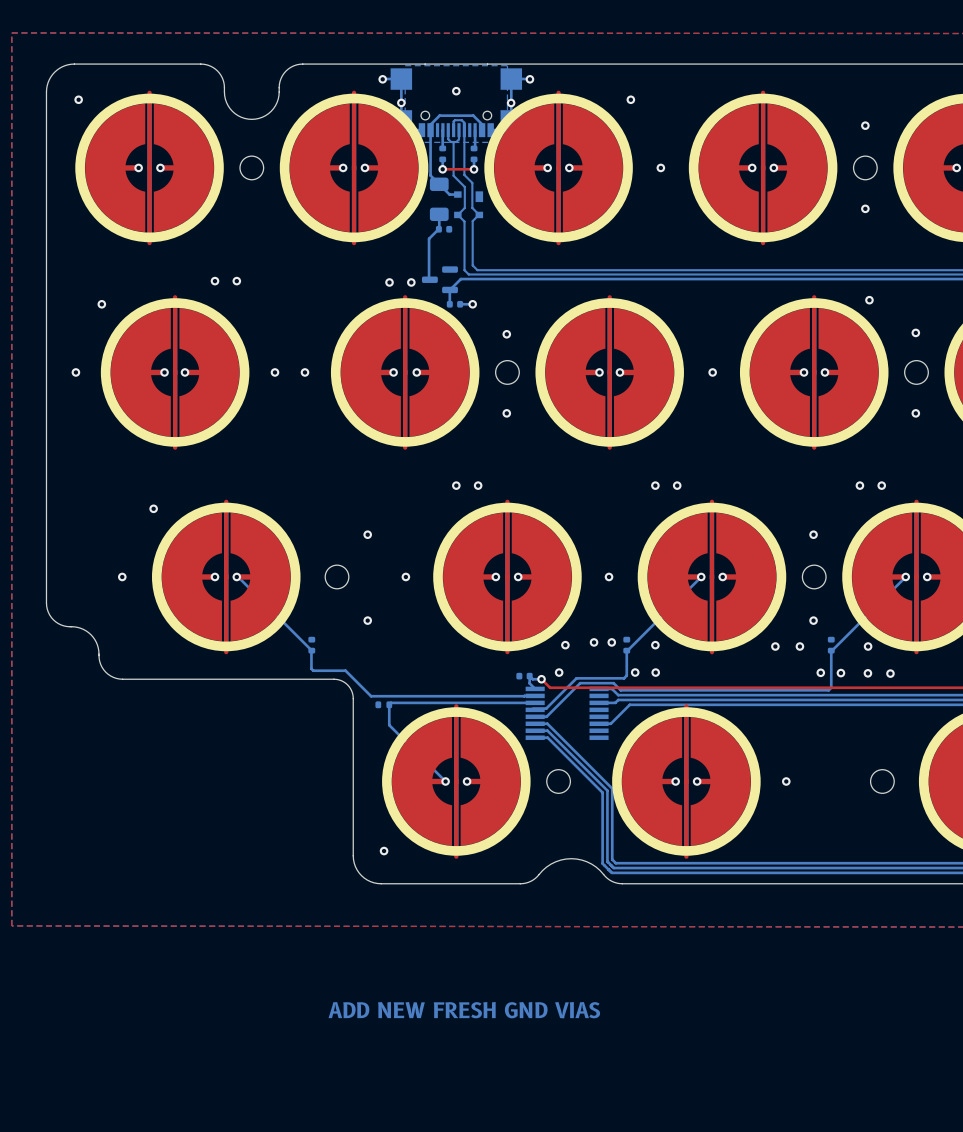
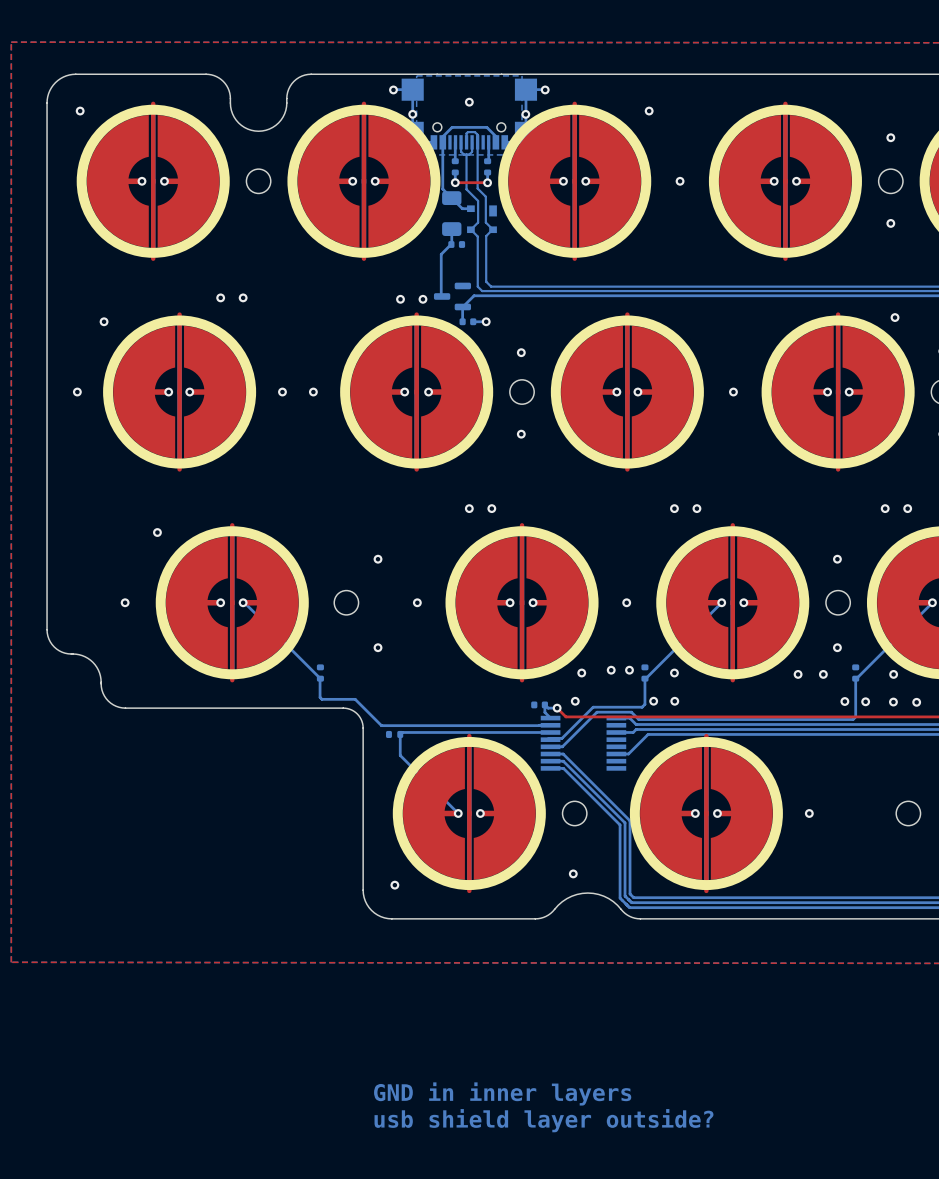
via: none -> (573, 873)
text: ADD NEW FRESH GND VIAS (464, 1010) -> none
text: none -> GND in inner layers (502, 1093)
text: none -> usb shield layer outside? (543, 1120)

